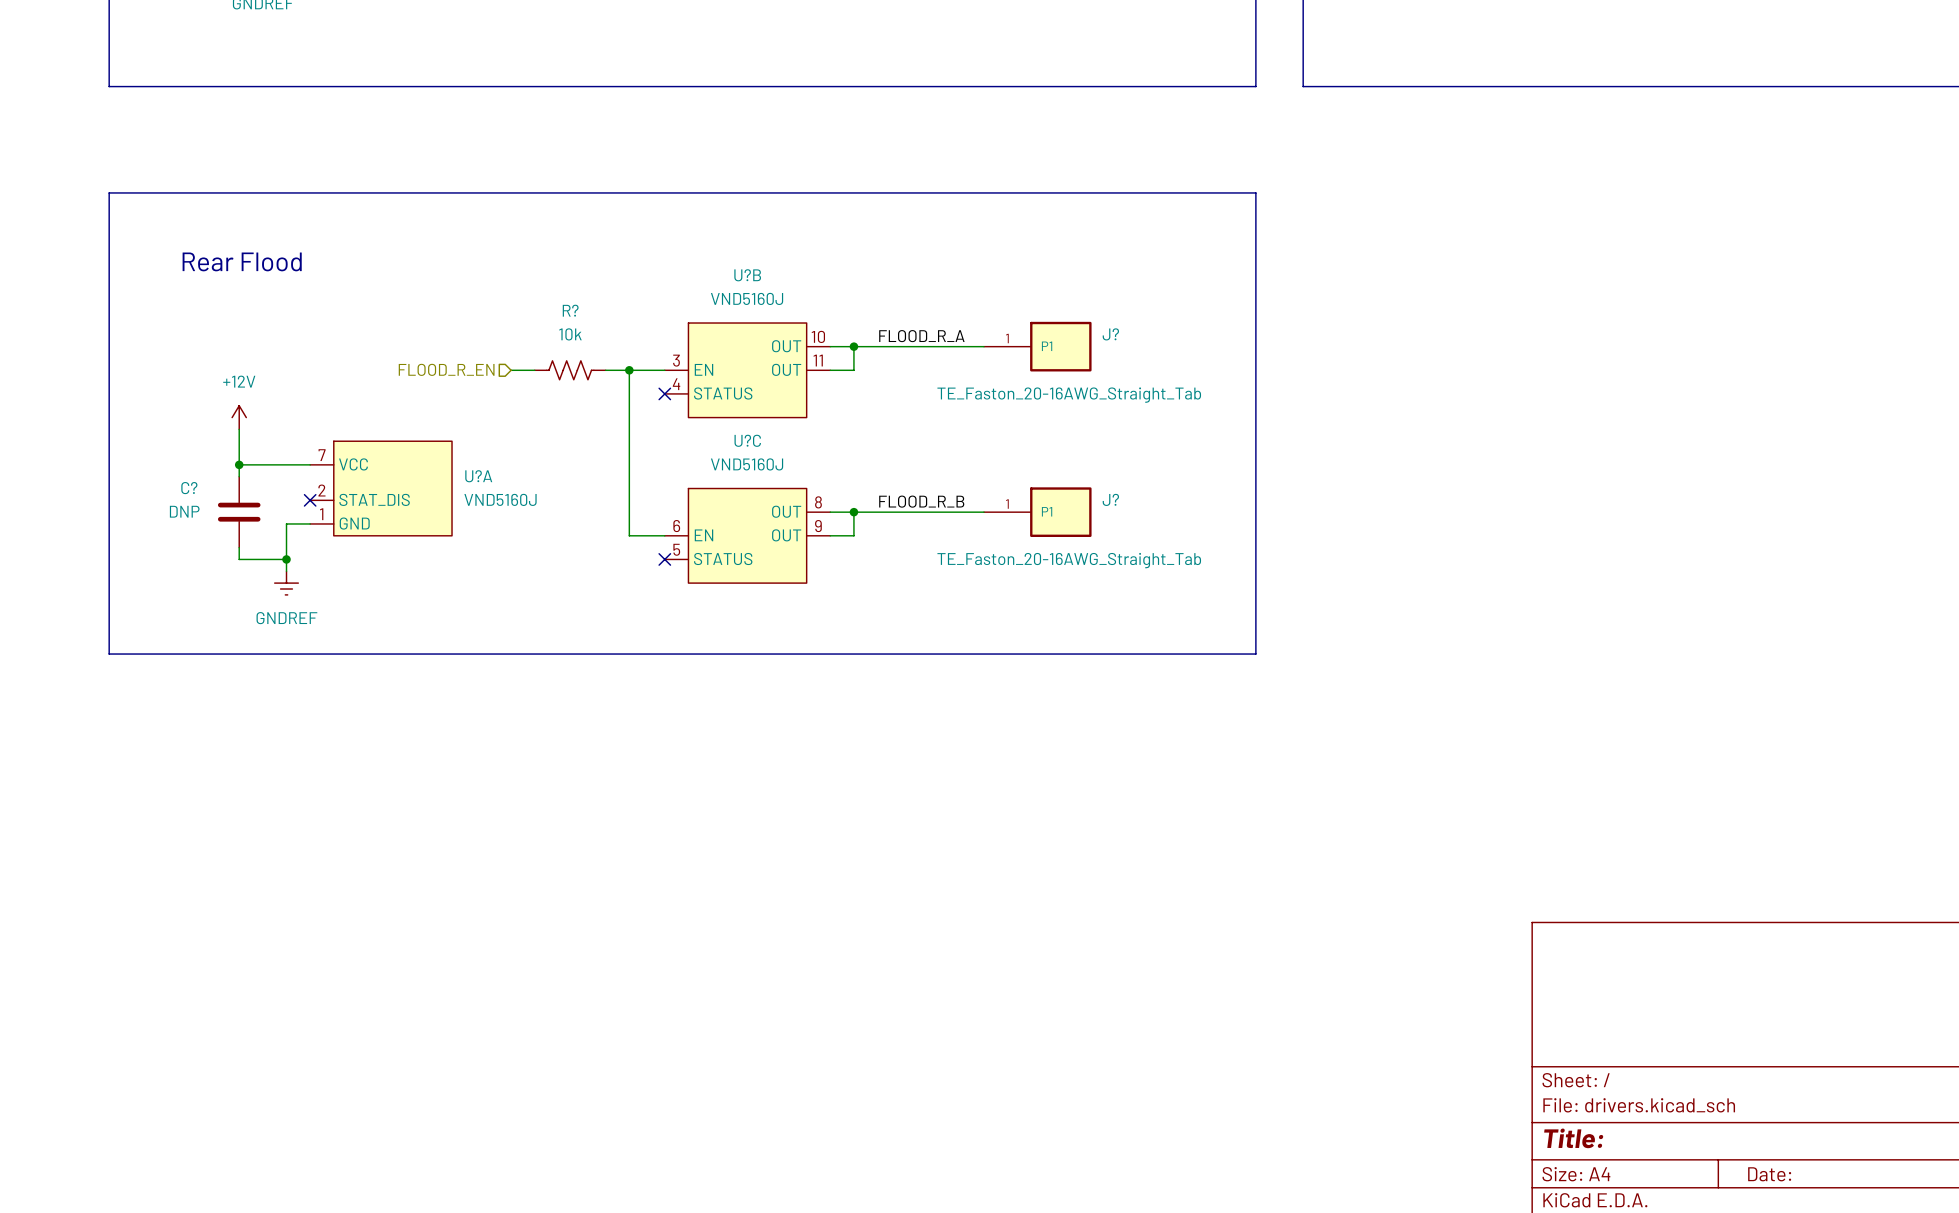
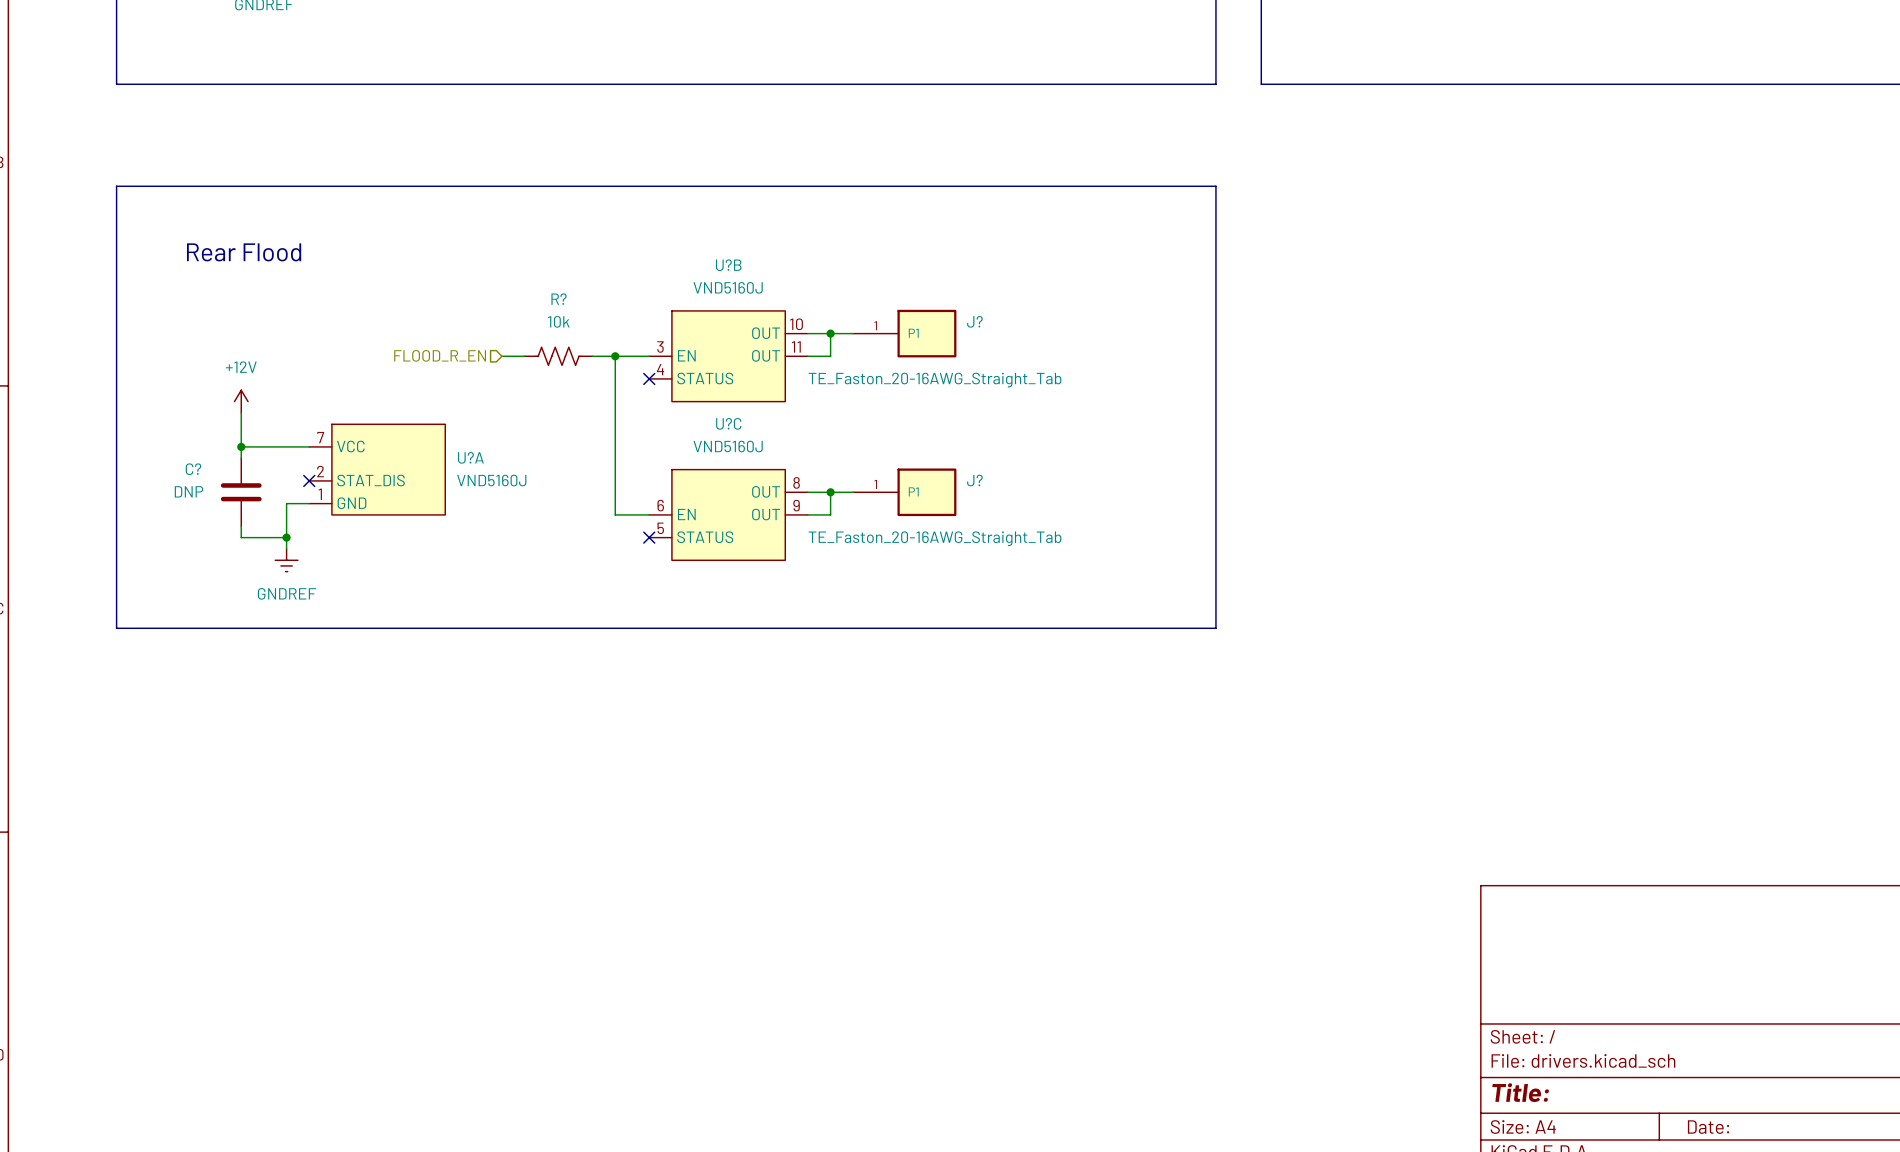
label: FLOOD_R_A (921, 336) -> none
J?: none -> TE_Faston_20-16AWG_Straight_Tab (904, 333)
J?: TE_Faston_20-16AWG_Straight_Tab (1037, 346) -> none
label: FLOOD_R_B (921, 501) -> none
J?: none -> TE_Faston_20-16AWG_Straight_Tab (904, 492)
J?: TE_Faston_20-16AWG_Straight_Tab (1037, 512) -> none

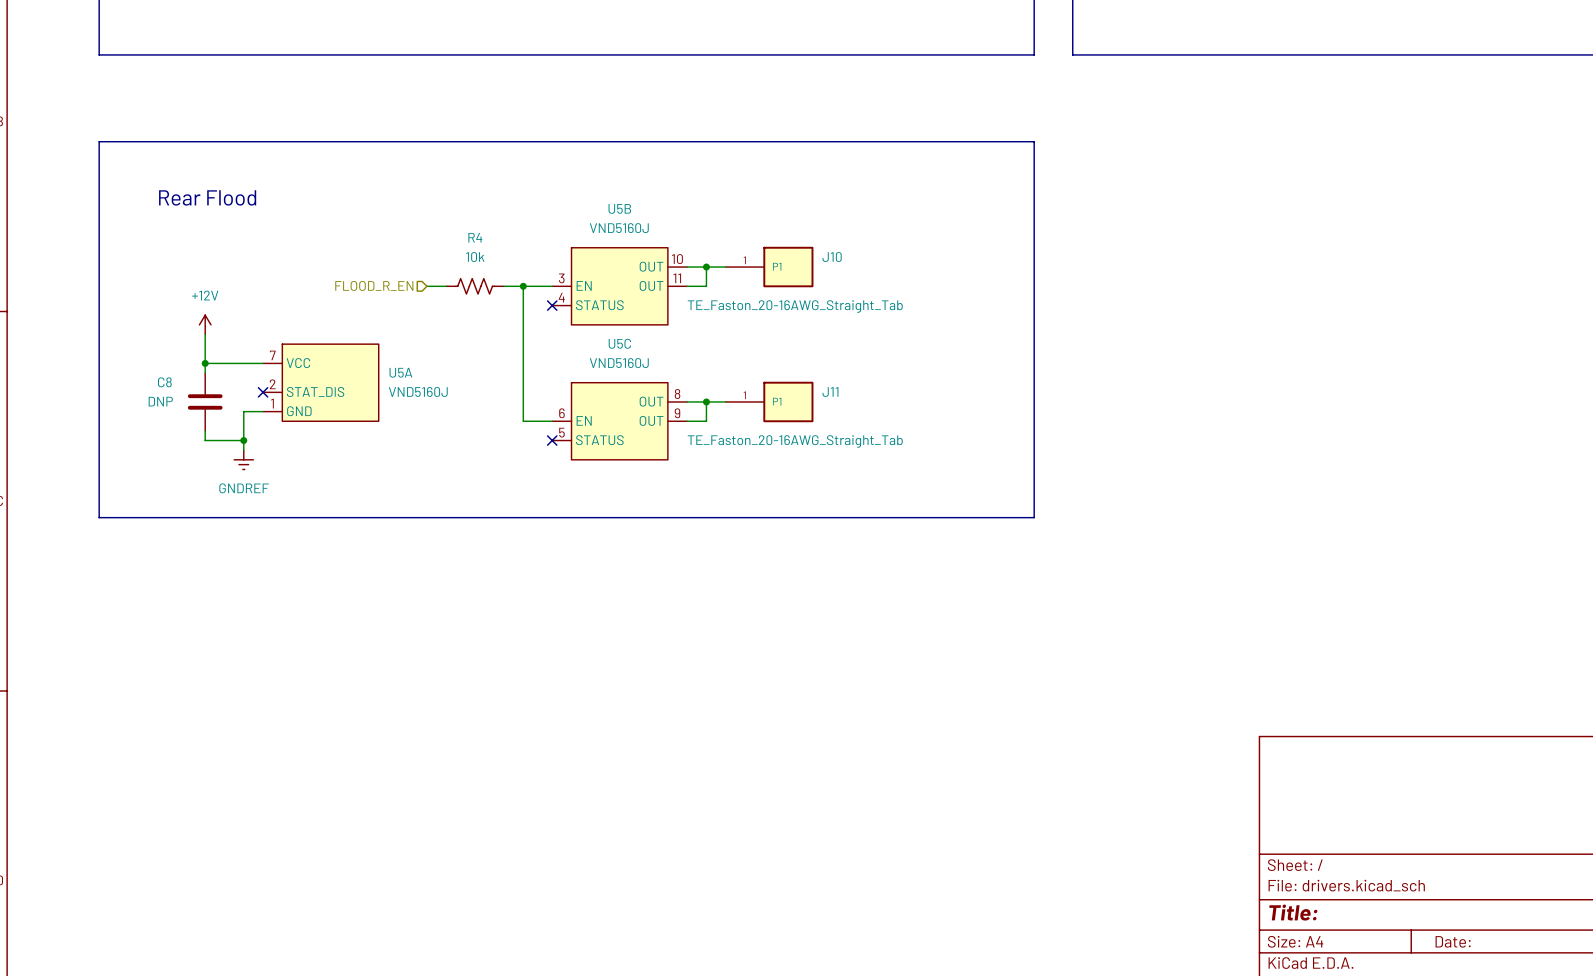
U?B name: U?B (728, 265) -> U5B (619, 208)
R? name: R? (559, 299) -> R4 (475, 237)
J? name: J? (974, 321) -> J10 (832, 257)
U?C name: U?C (728, 423) -> U5C (619, 343)
U?A name: U?A (470, 457) -> U5A (400, 372)
C? name: C? (193, 469) -> C8 (164, 382)
J? name: J? (974, 480) -> J11 (830, 392)

